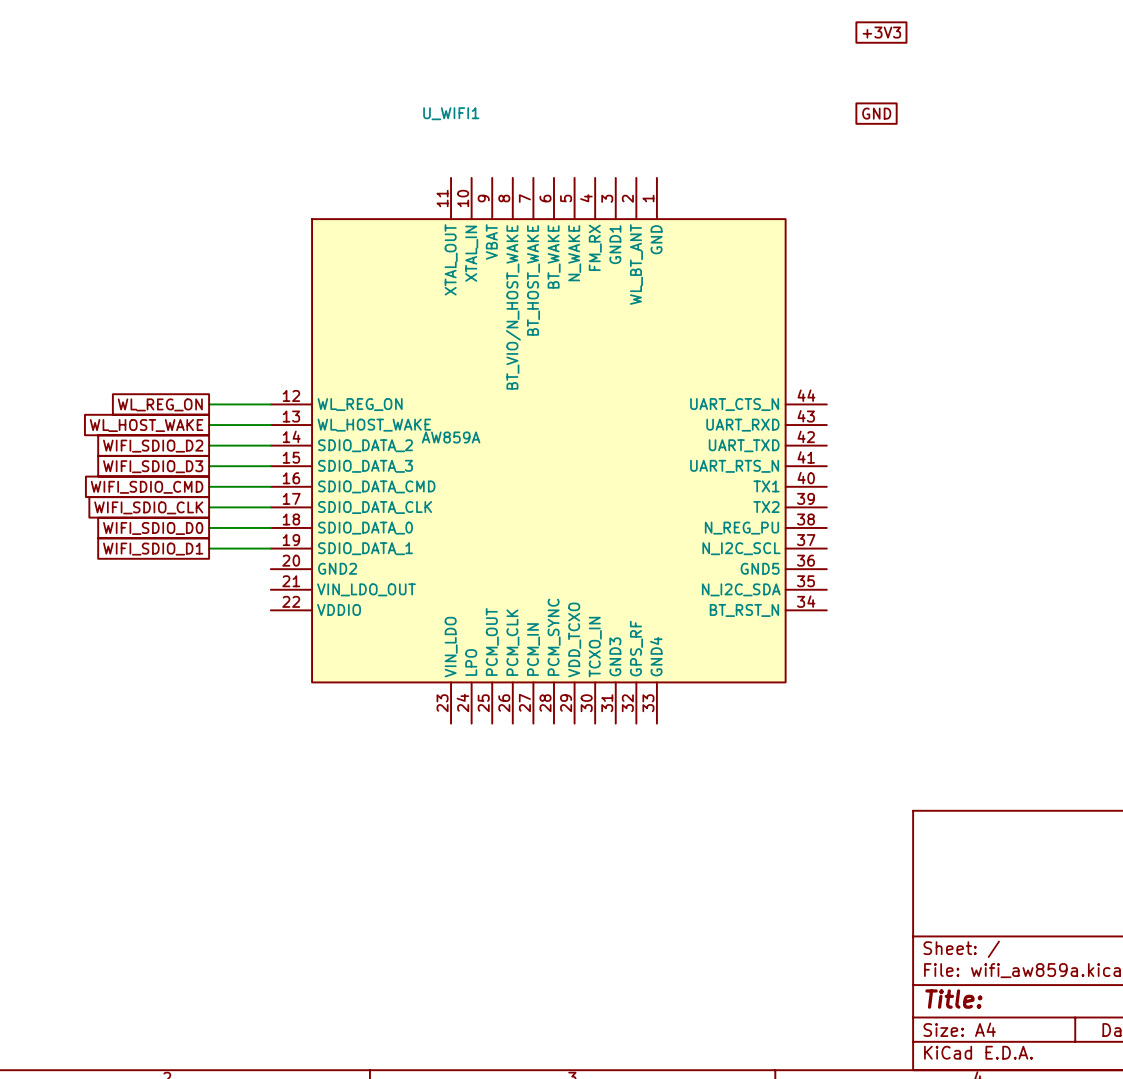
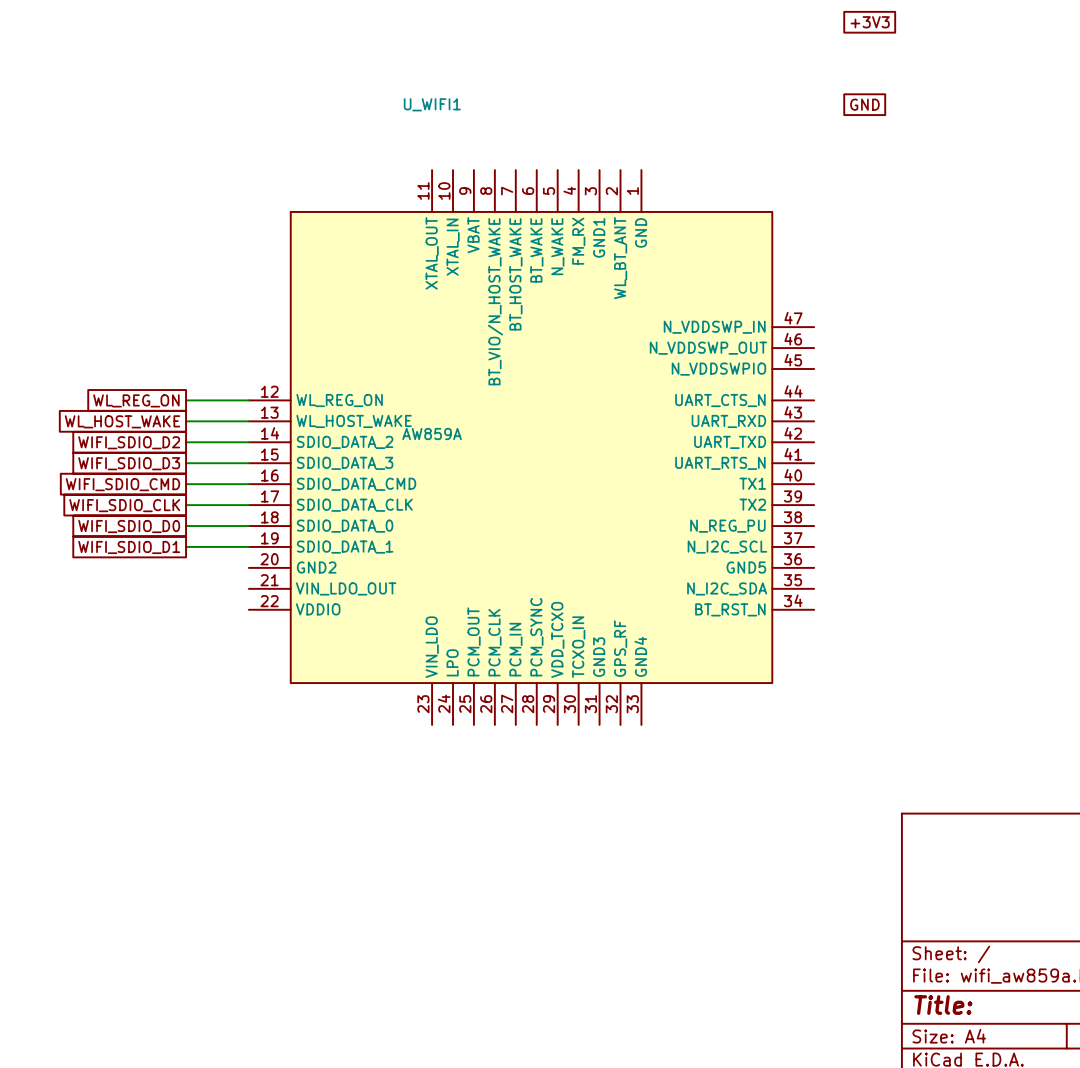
U_WIFI1 symbol: [270, 177, 827, 724] -> [248, 170, 815, 725]

